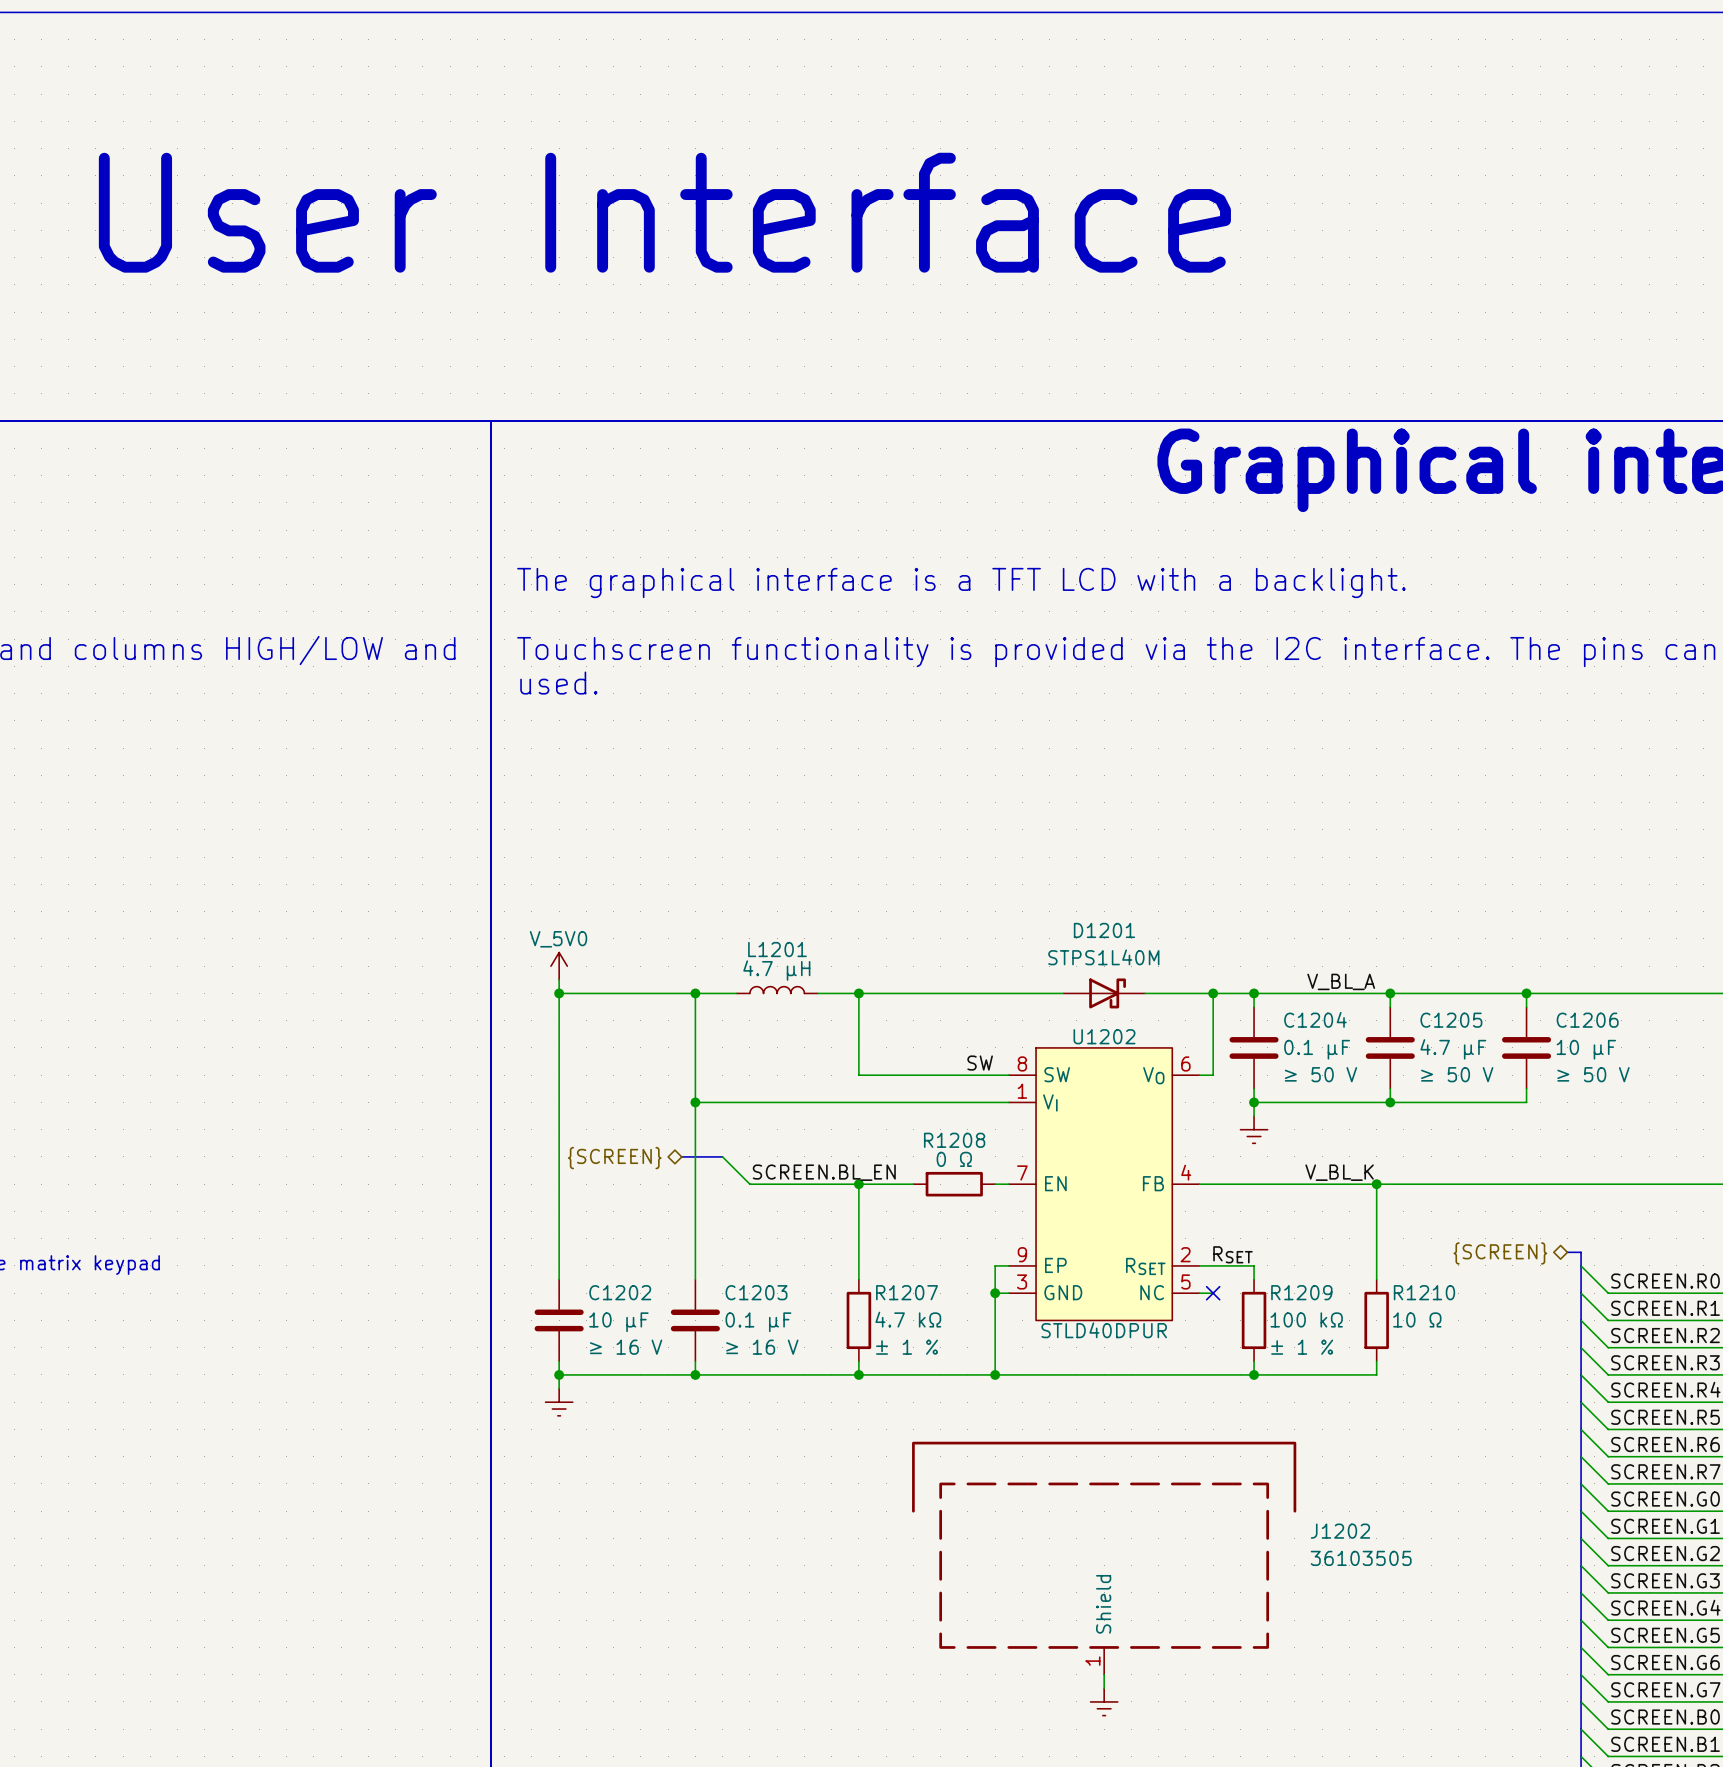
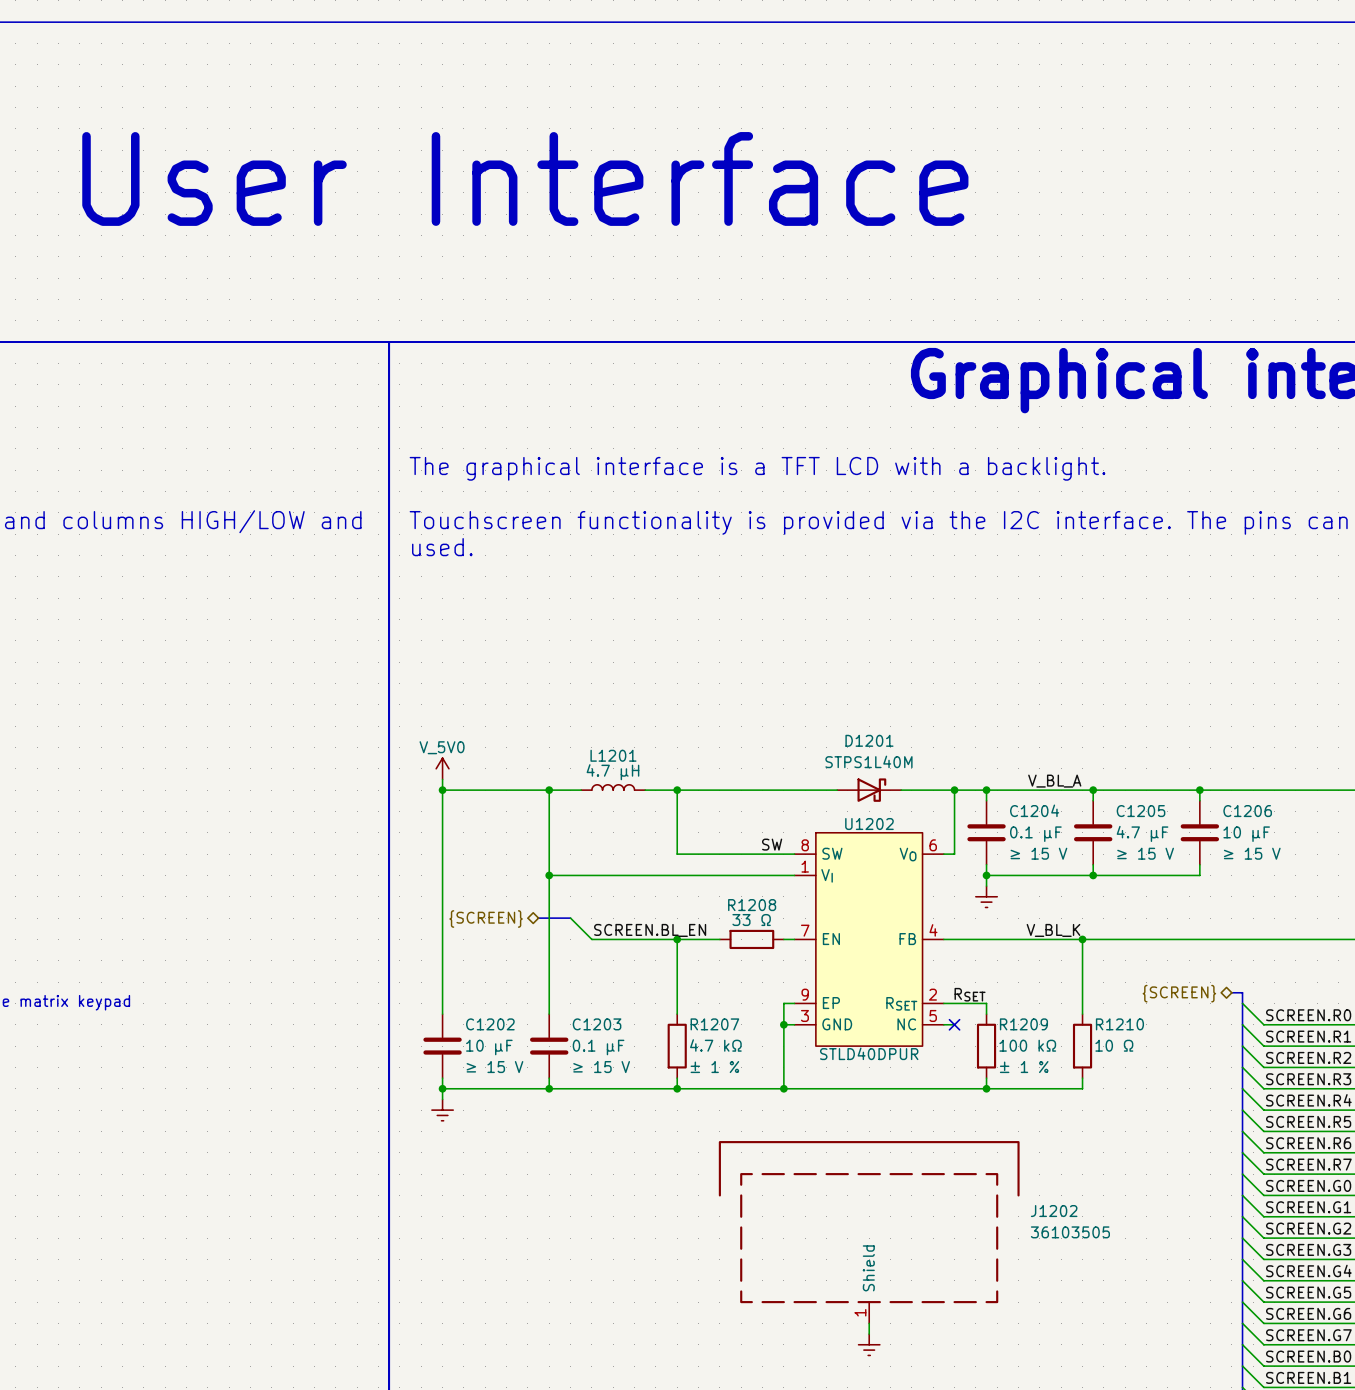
C1204 text: ≥ 50 V (1320, 1074) -> ≥ 15 V (1038, 853)
C1205 text: ≥ 50 V (1457, 1074) -> ≥ 15 V (1145, 853)
C1206 text: ≥ 50 V (1593, 1074) -> ≥ 15 V (1252, 853)
R1208 value: 0 Ω (954, 1159) -> 33 Ω (751, 920)
C1202 text: ≥ 16 V (626, 1347) -> ≥ 15 V (494, 1067)
C1203 text: ≥ 16 V (762, 1347) -> ≥ 15 V (601, 1067)

